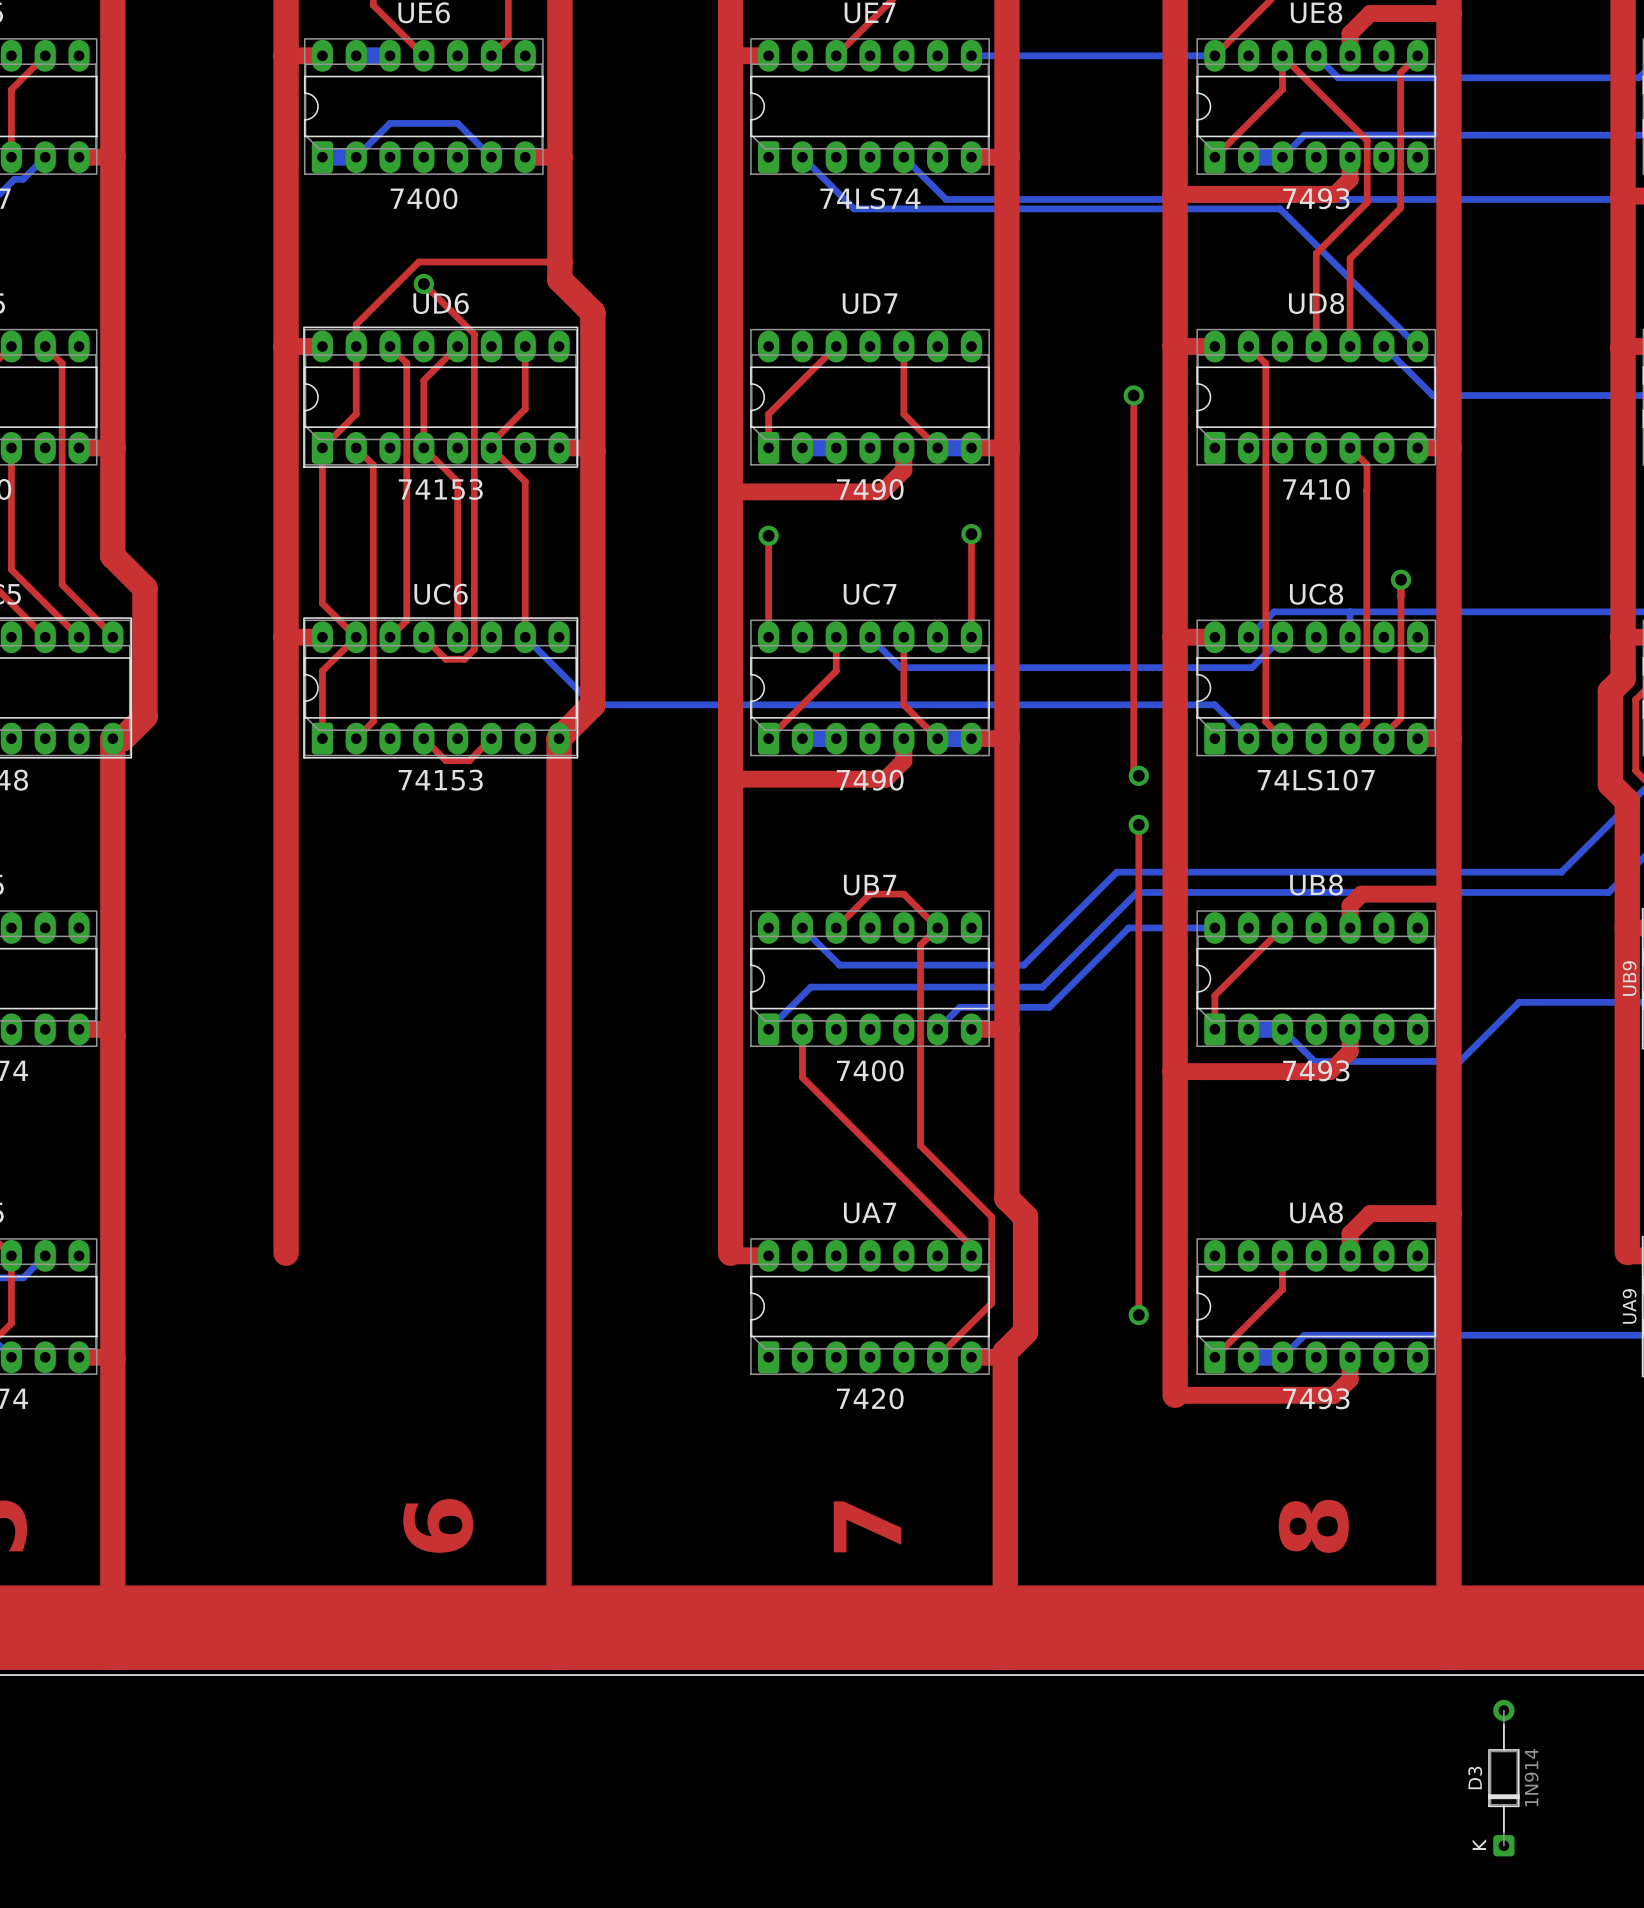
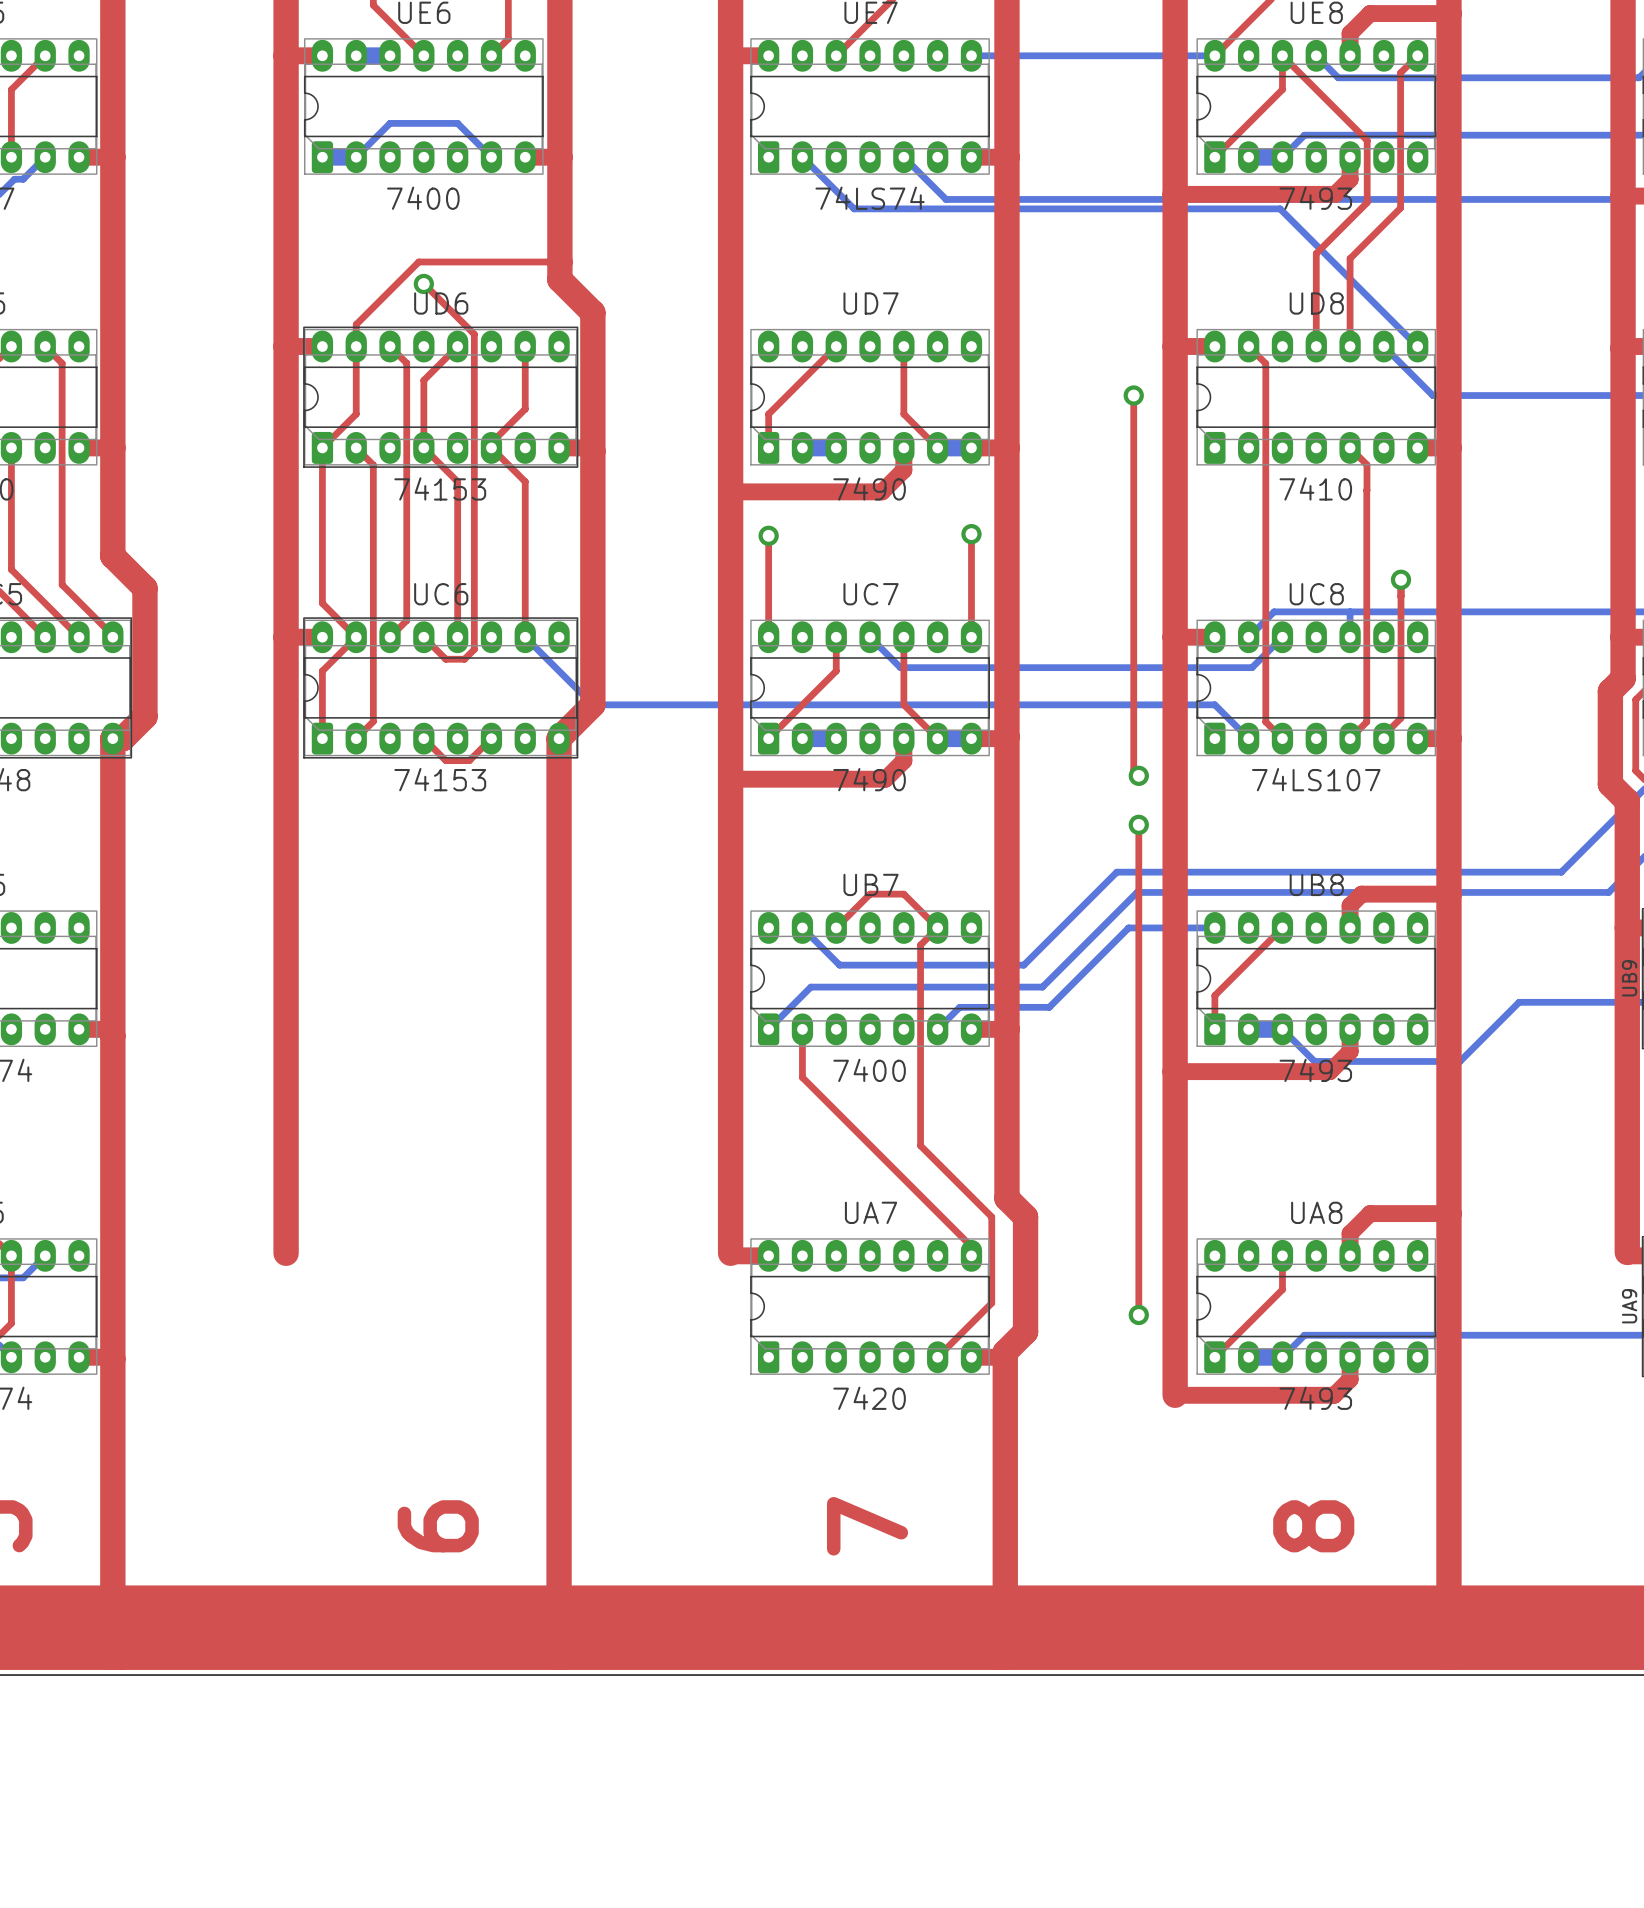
D3: 1N914 (1503, 1778) -> none

